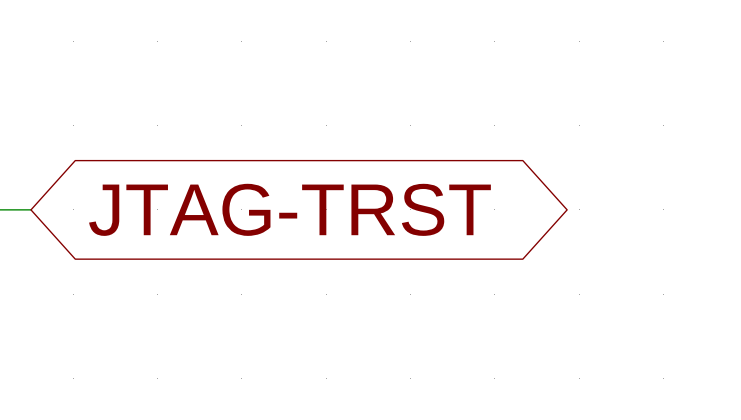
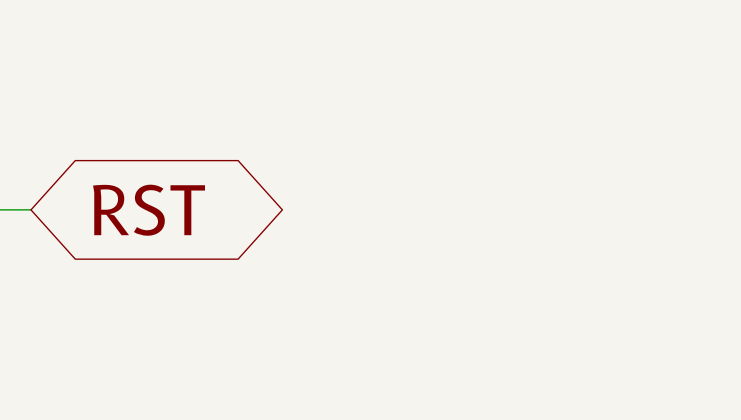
global label: JTAG-TRST (289, 209) -> RST (149, 210)

